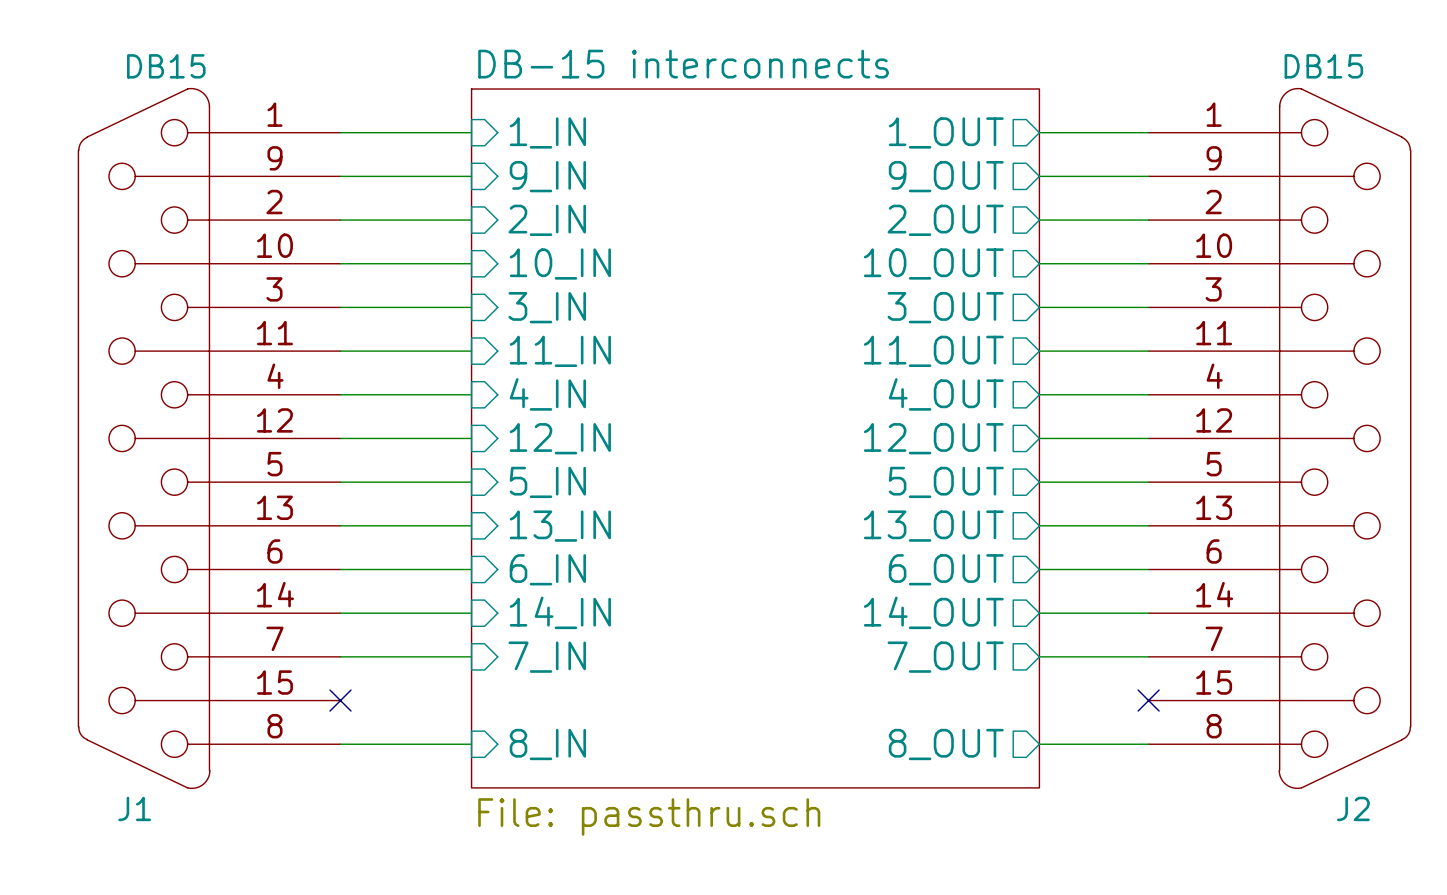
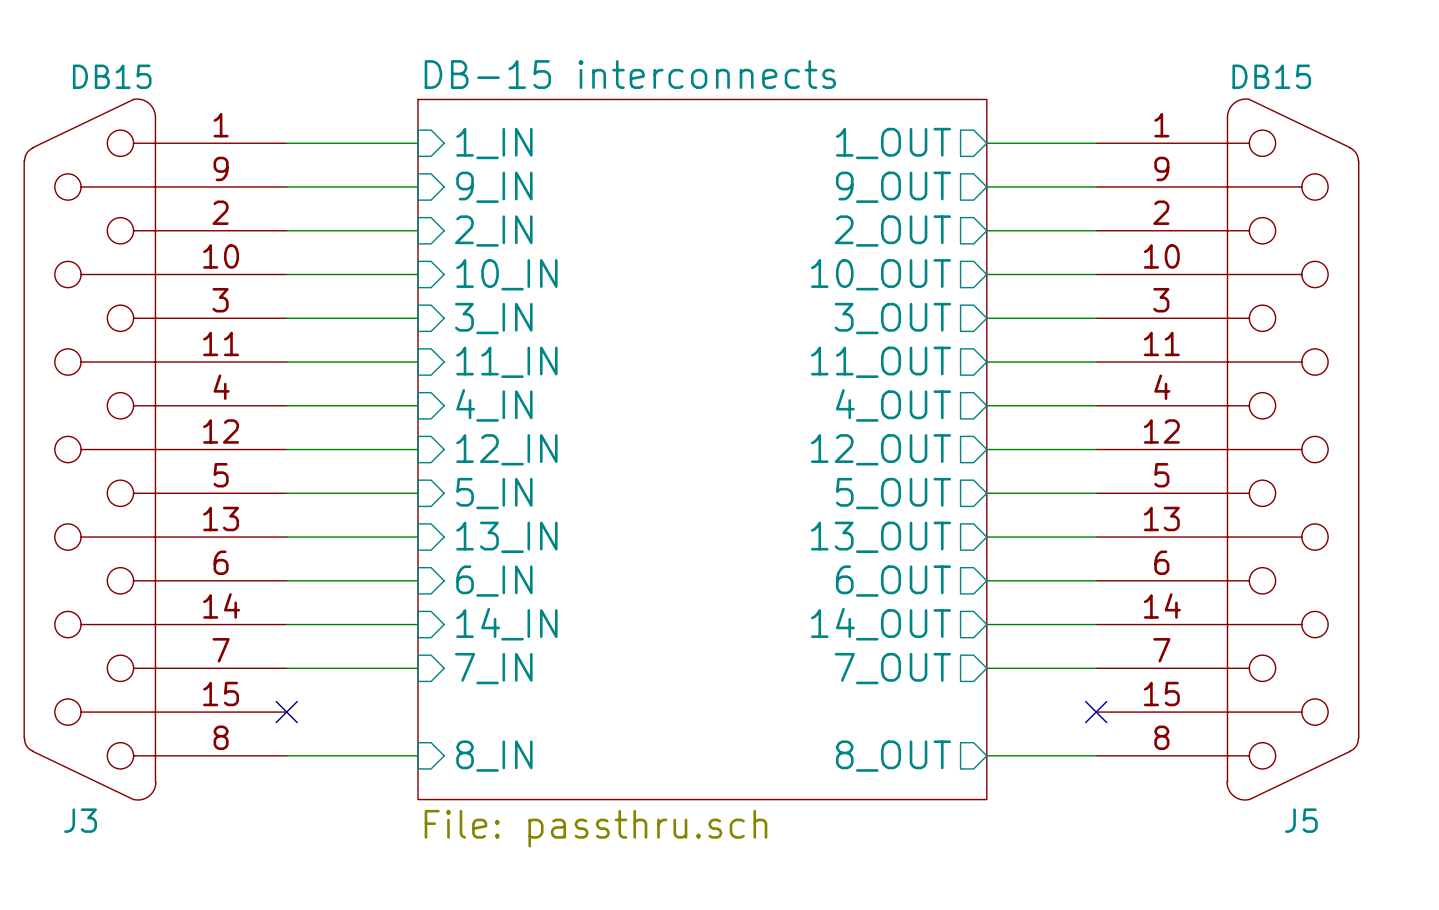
J1 name: J1 (134, 808) -> J3 (80, 820)
J2 name: J2 (1353, 808) -> J5 (1301, 820)

